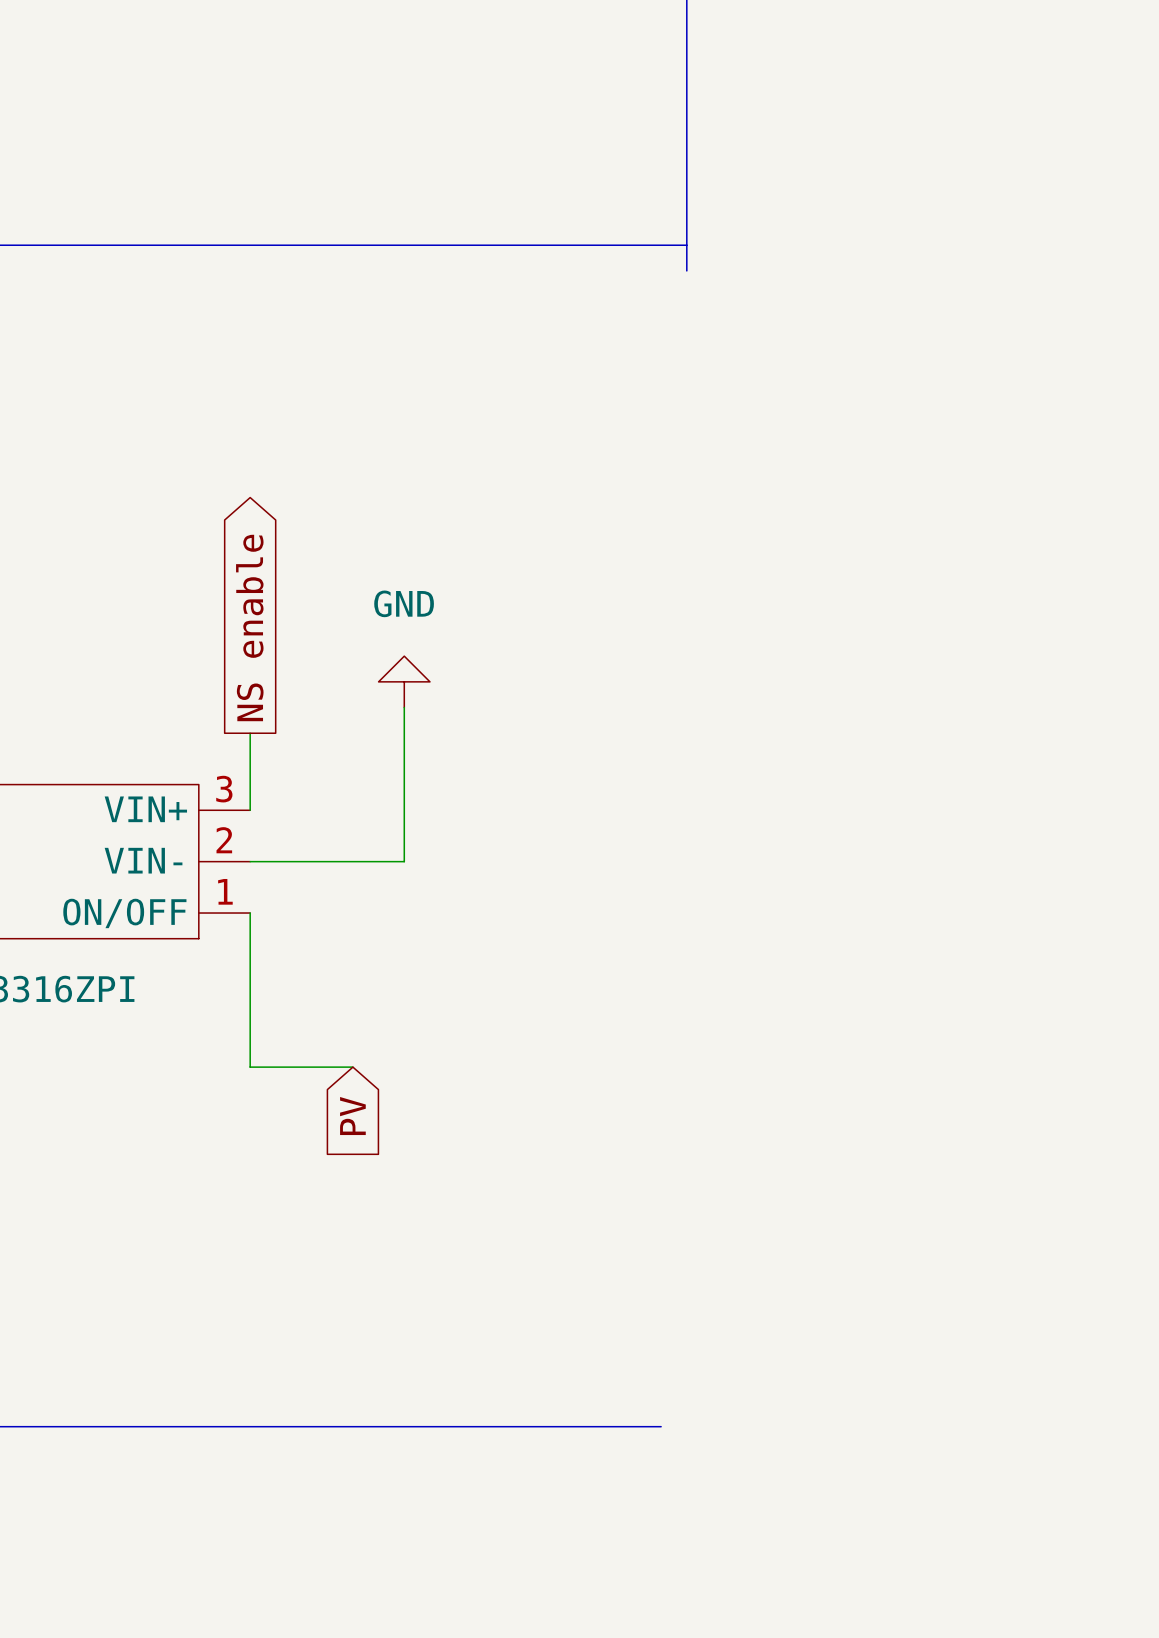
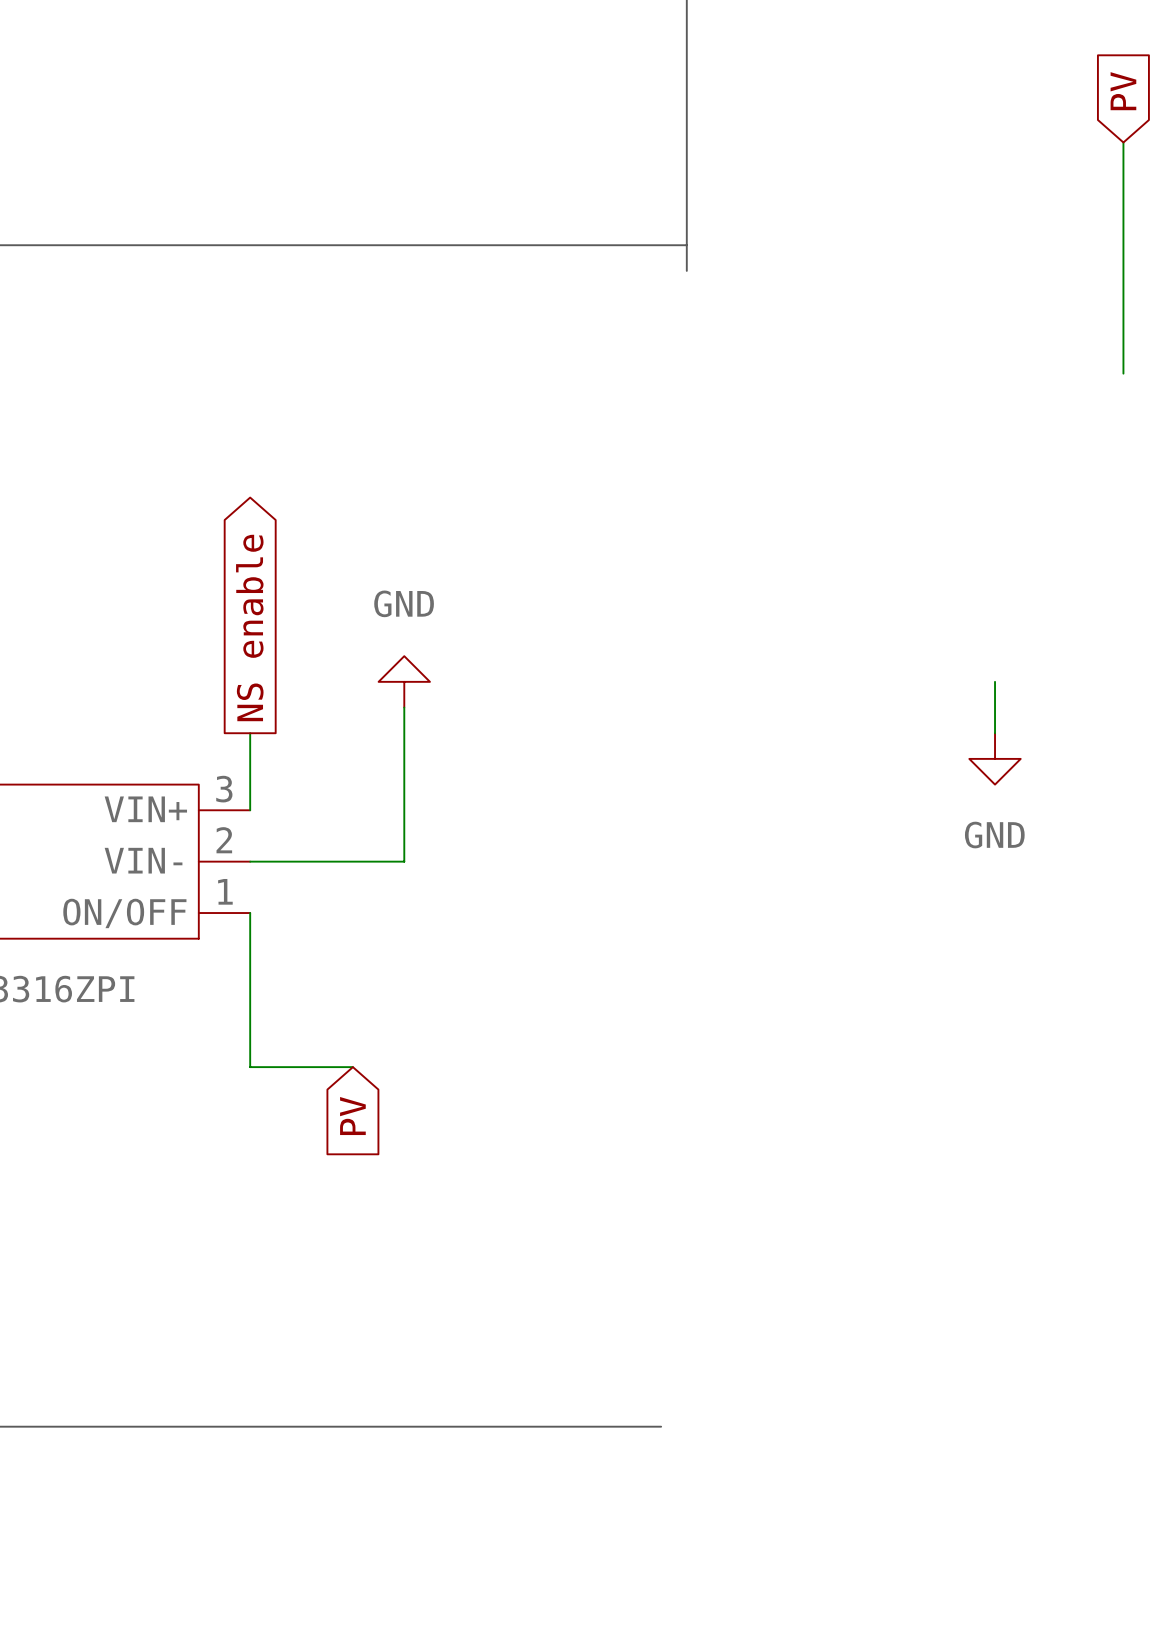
global label: none -> PV (1123, 91)
wire: none -> (1123, 142) (1123, 373)
wire: none -> (995, 681) (995, 733)
power symbol: none -> GND (995, 758)

